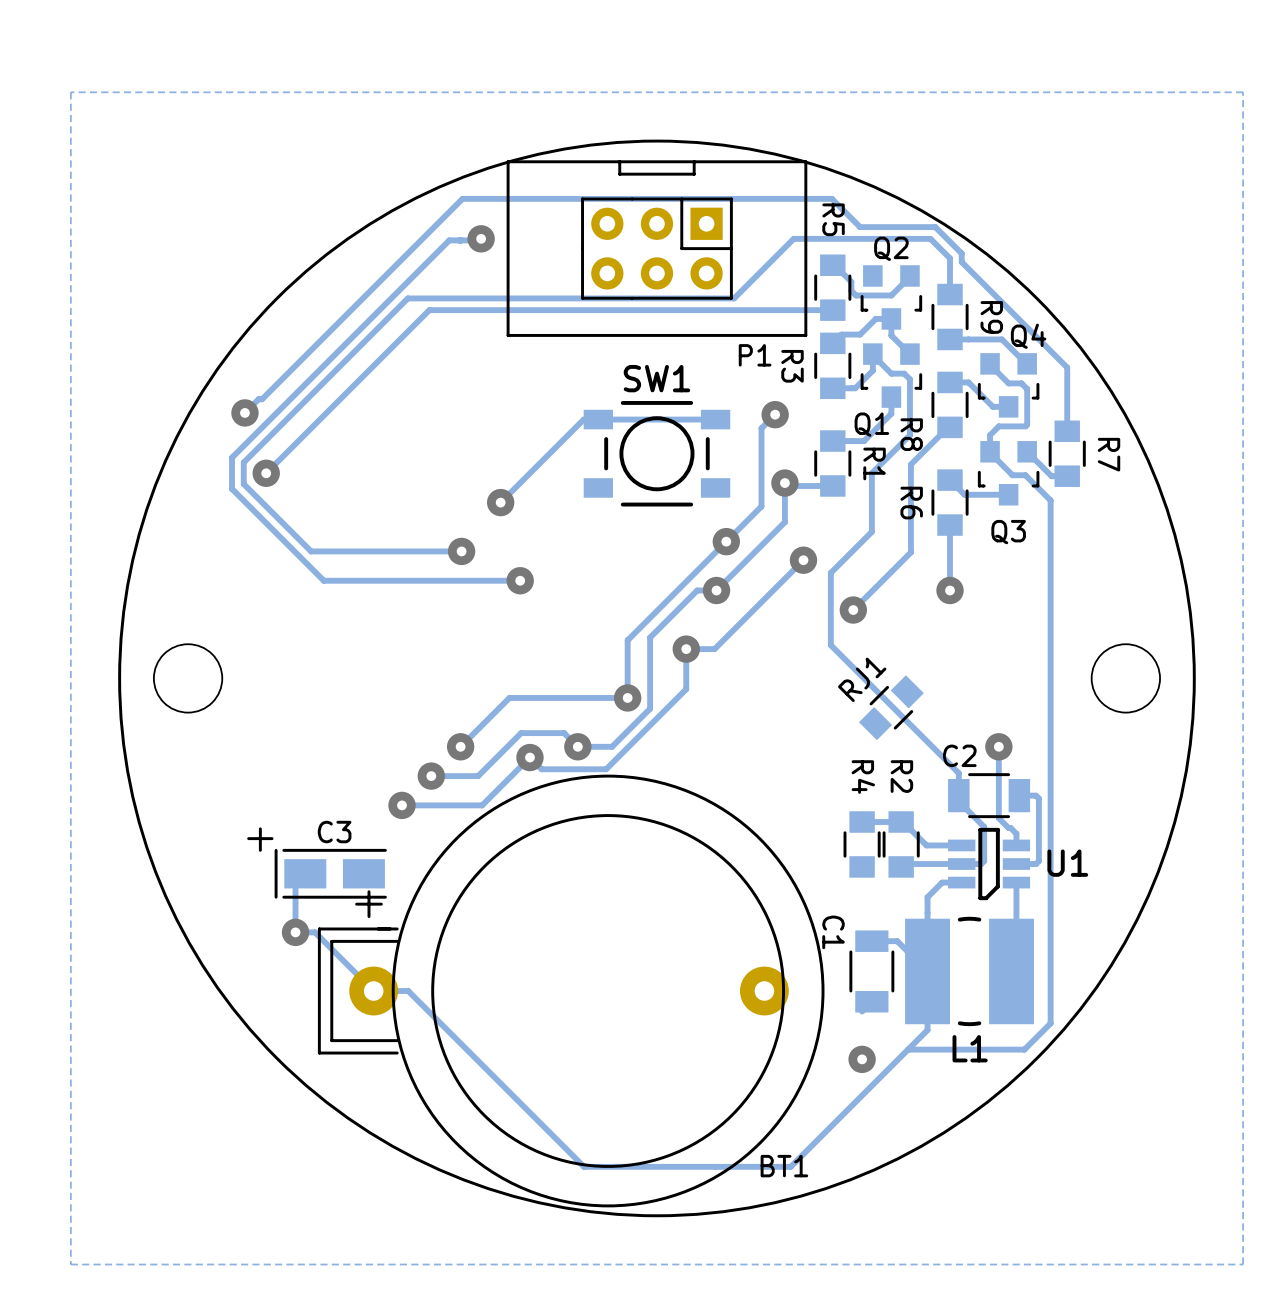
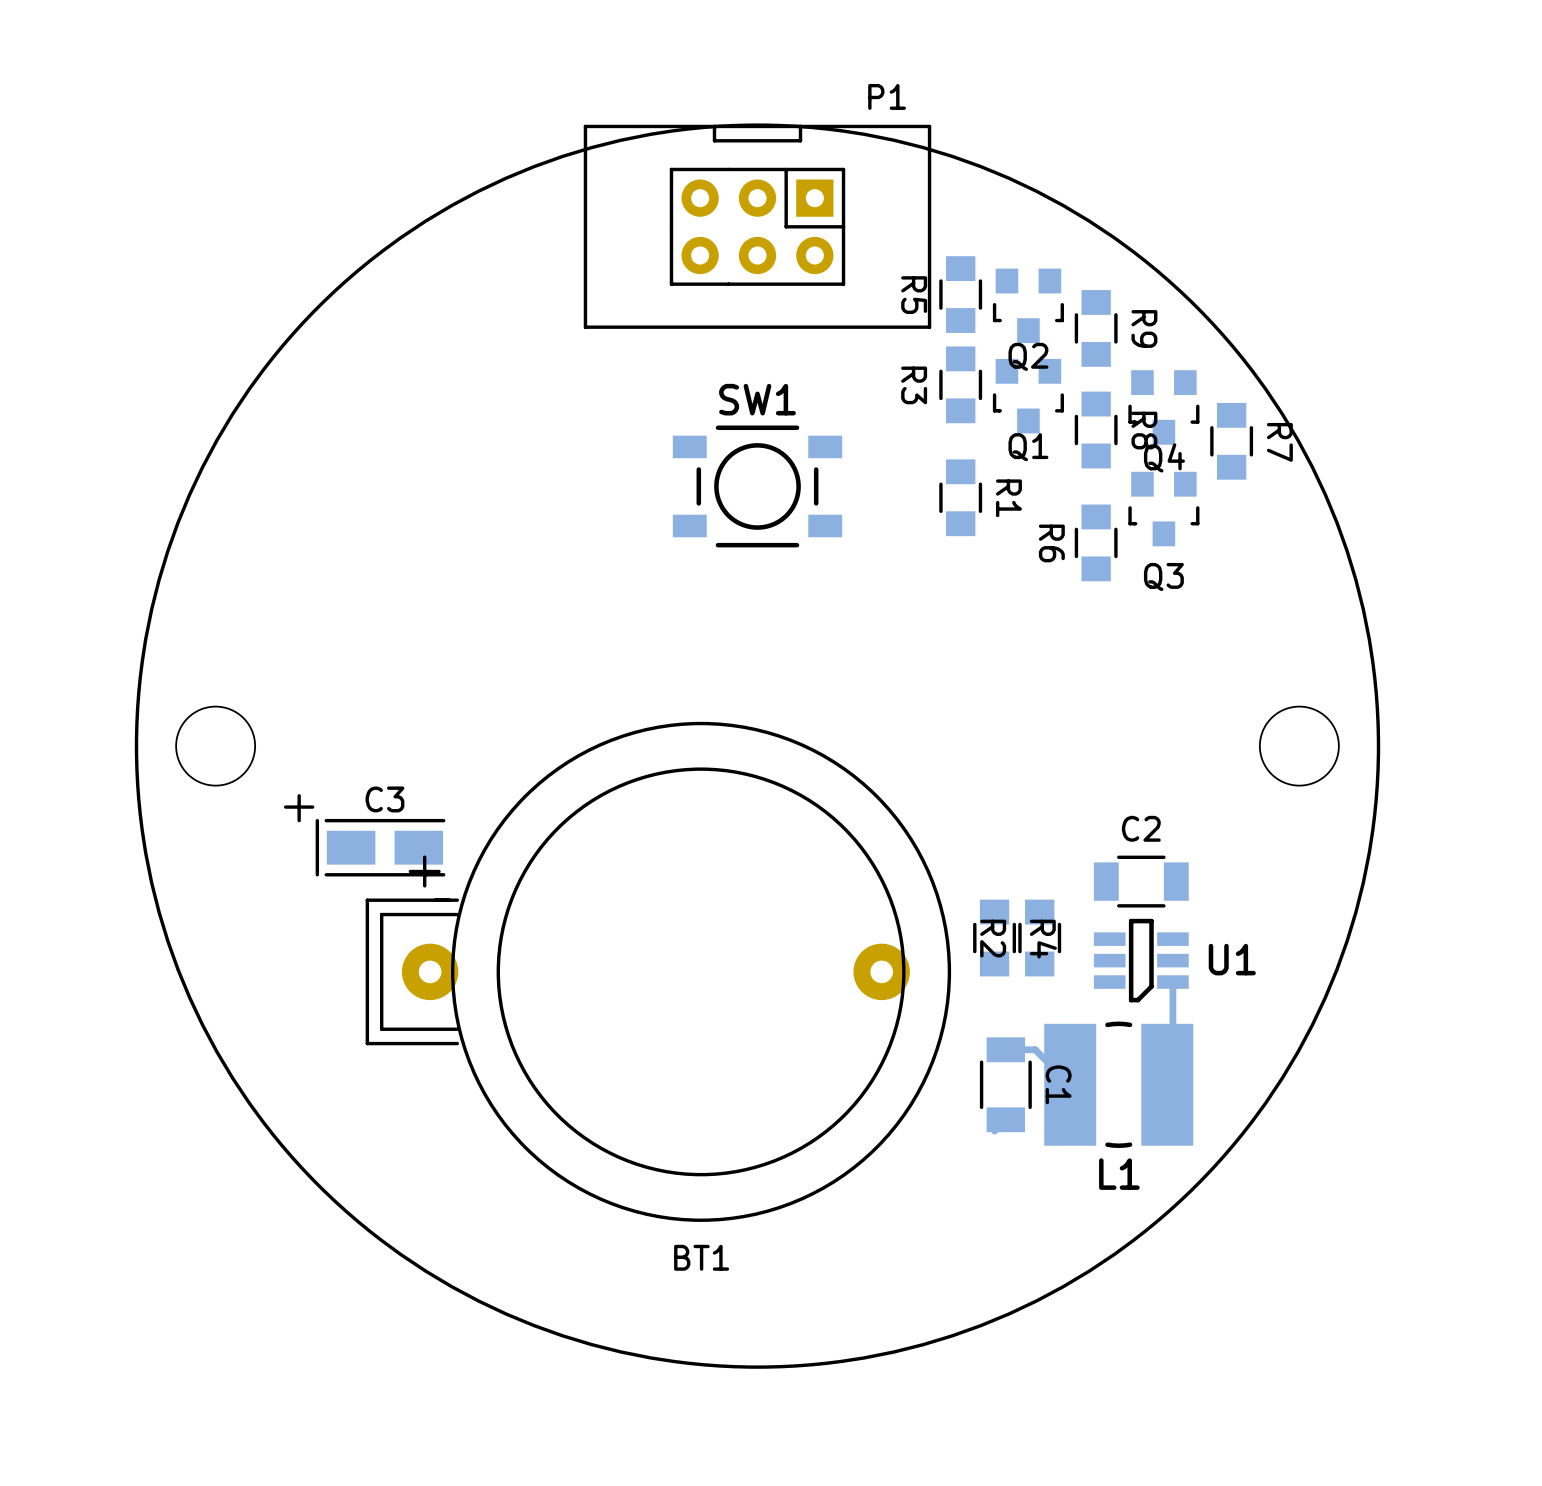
zone outline: (1243, 92) (70, 92) (70, 1264) (1243, 1264) (1243, 92) -> none
R5 name position: R5 (833, 219) -> R5 (914, 295)
track: (481, 238) (449, 240) (232, 457) (232, 488) (323, 580) (520, 580) -> none
via: (481, 238) -> none
P1 position: (656, 248) -> (757, 226)
Q2 name position: Q2 (891, 248) -> Q2 (1028, 356)
track: (832, 265) (851, 281) (851, 290) (856, 295) (891, 295) (909, 275) -> none
track: (950, 294) (950, 258) (930, 238) (793, 238) (734, 298) (407, 298) (243, 462) (243, 484) (311, 551) (461, 551) -> none
track: (823, 310) (429, 310) (266, 473) -> none
Q4 name position: Q4 (1028, 336) -> Q4 (1164, 457)
track: (950, 339) (1001, 339) (1027, 363) -> none
track: (832, 343) (841, 334) (860, 334) (875, 318) (891, 318) (891, 335) (909, 354) -> none
track: (872, 354) (872, 370) (855, 388) (832, 388) -> none
P1 name position: P1 (755, 355) -> P1 (887, 96)
track: (872, 355) (891, 373) (904, 373) (909, 379) (909, 435) (871, 473) (871, 531) (830, 572) (830, 645) (958, 773) (958, 801) (984, 826) (984, 861) (981, 864) (904, 864) (901, 866) -> none
track: (990, 363) (1008, 383) (1021, 383) (1027, 389) (1027, 424) (1025, 426) (998, 426) (990, 435) (990, 452) (1012, 475) (1025, 475) (1050, 500) (1050, 1023) (1024, 1049) (908, 1049) -> none
track: (950, 382) (968, 382) (992, 406) (1008, 406) -> none
track: (891, 397) (891, 413) (864, 441) (832, 441) -> none
track: (244, 412) (258, 399) (262, 399) (462, 198) (831, 198) (860, 227) (935, 227) (961, 253) (961, 262) (1067, 367) (1067, 431) -> none
via: (244, 412) -> none
track: (775, 414) (761, 428) (761, 506) (627, 640) (627, 697) (509, 697) (460, 746) -> none
via: (775, 414) -> none
track: (715, 419) (583, 419) (500, 502) -> none
Q1 name position: Q1 (871, 424) -> Q1 (1028, 447)
track: (950, 427) (910, 464) (910, 552) (853, 610) -> none
R8 name position: R8 (911, 434) -> R8 (1144, 430)
track: (1027, 451) (1051, 476) (1067, 476) -> none
R7 position: (1067, 453) -> (1231, 441)
via: (266, 473) -> none
track: (950, 480) (964, 494) (1008, 494) -> none
via: (784, 483) -> none
track: (832, 485) (787, 485) (784, 483) (784, 522) (716, 590) (697, 590) (650, 637) (650, 708) (612, 746) (577, 746) (564, 733) (521, 733) (478, 776) (431, 776) -> none
via: (500, 502) -> none
track: (950, 525) (950, 590) -> none
via: (726, 541) -> none
via: (461, 551) -> none
track: (803, 560) (714, 649) (686, 649) (686, 689) (606, 769) (541, 769) (529, 757) (482, 805) (402, 805) -> none
via: (803, 560) -> none
via: (520, 580) -> none
via: (716, 590) -> none
via: (950, 590) -> none
via: (853, 610) -> none
via: (686, 649) -> none
via: (627, 697) -> none
RJ1: (891, 707) -> none
via: (460, 746) -> none
via: (577, 746) -> none
track: (998, 746) (998, 818) (1016, 833) (1016, 845) -> none
via: (998, 746) -> none
C2 name position: C2 (959, 755) -> C2 (1141, 828)
via: (529, 757) -> none
via: (431, 776) -> none
R2 name position: R2 (901, 776) -> R2 (993, 938)
R4 name position: R4 (863, 777) -> R4 (1043, 939)
track: (1019, 795) (1035, 795) (1038, 798) (1038, 861) (1035, 864) (1016, 864) -> none
via: (402, 805) -> none
track: (862, 822) (903, 822) (926, 845) (961, 845) -> none
C3 position: (317, 863) -> (364, 835)
track: (305, 873) (295, 883) (295, 932) (315, 932) (373, 991) (408, 991) (584, 1166) (790, 1166) (927, 1030) (927, 897) (942, 882) (961, 882) -> none
via: (295, 932) -> none
C1 name position: C1 (833, 932) -> C1 (1058, 1084)
BT1 position: (571, 991) -> (658, 971)
via: (862, 1059) -> none
BT1 name position: BT1 (784, 1166) -> BT1 (701, 1257)

